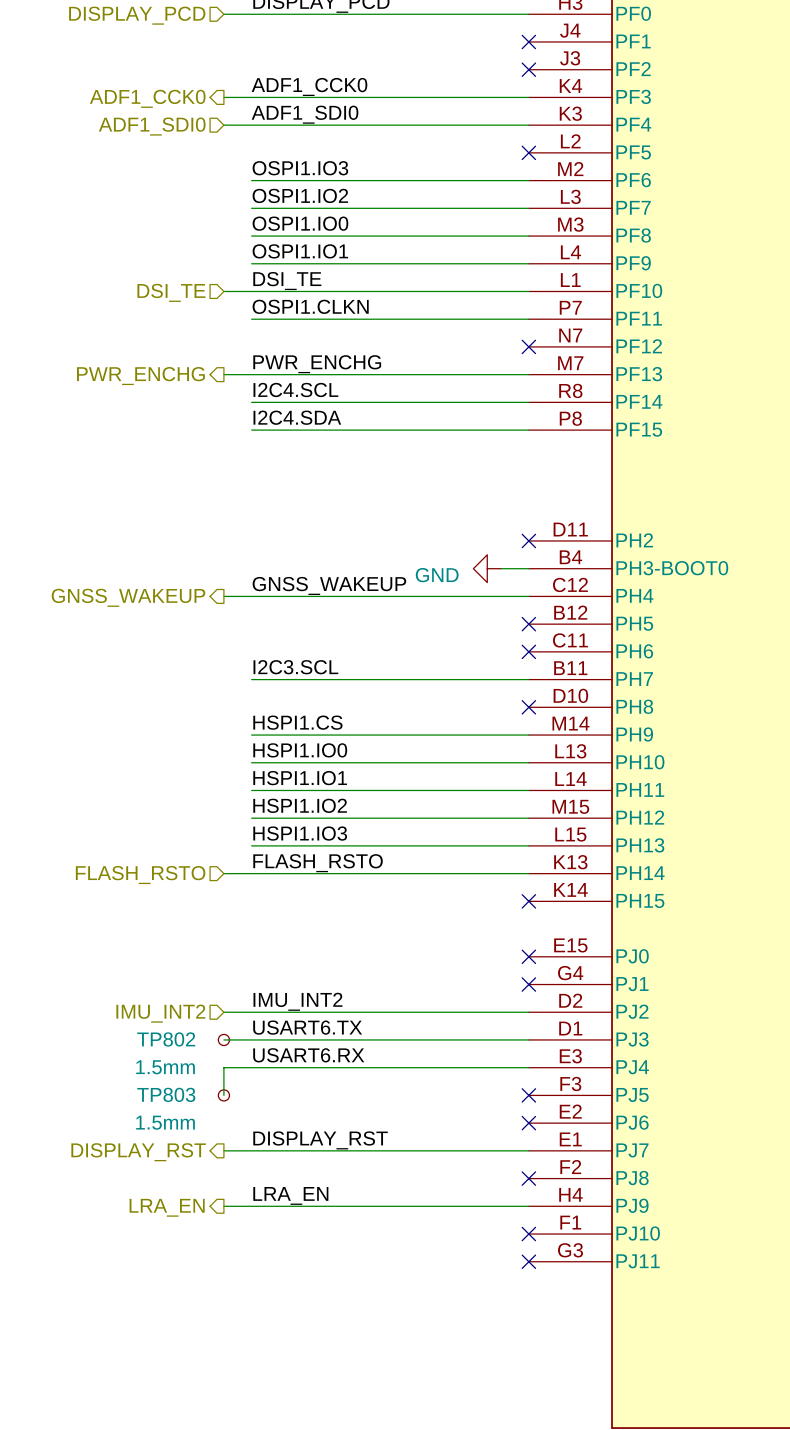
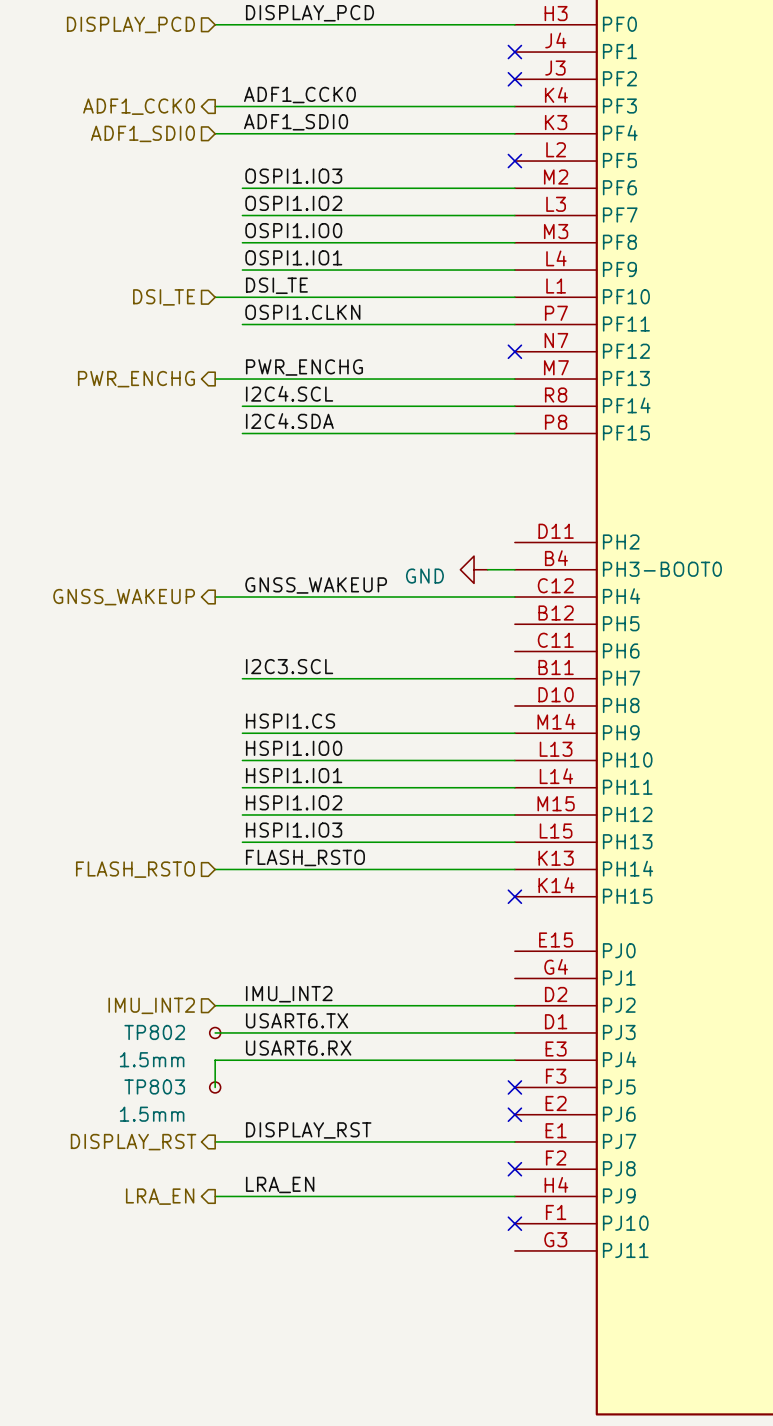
no-connect mark: (528, 540) -> none
no-connect mark: (528, 624) -> none
no-connect mark: (528, 651) -> none
no-connect mark: (528, 707) -> none
no-connect mark: (528, 956) -> none
no-connect mark: (528, 984) -> none
no-connect mark: (528, 1261) -> none

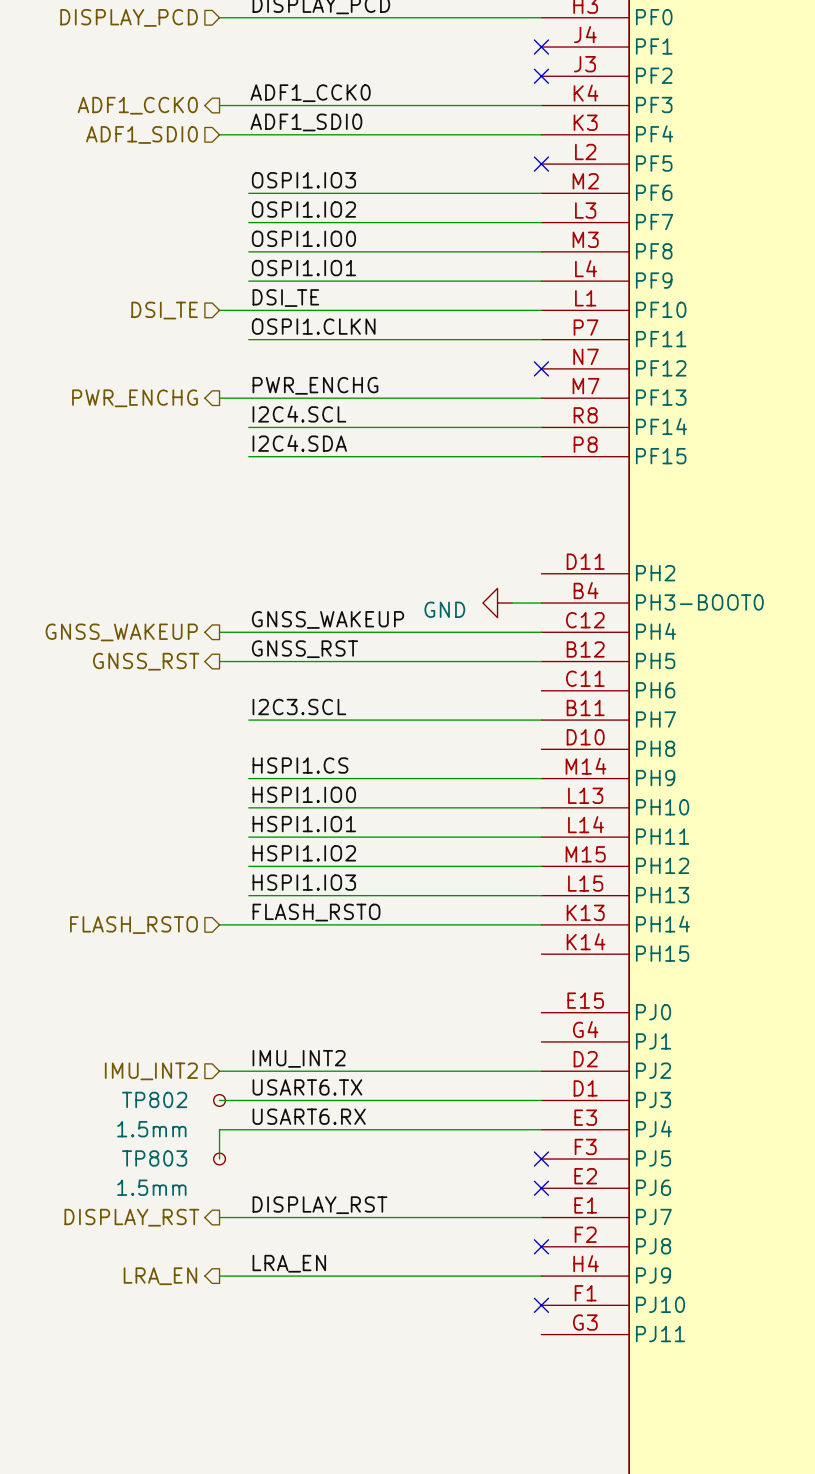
label: none -> GNSS_RST (304, 649)
hierarchical label: none -> GNSS_RST (146, 661)
wire: none -> (219, 661) (541, 661)
no-connect mark: (514, 896) -> none

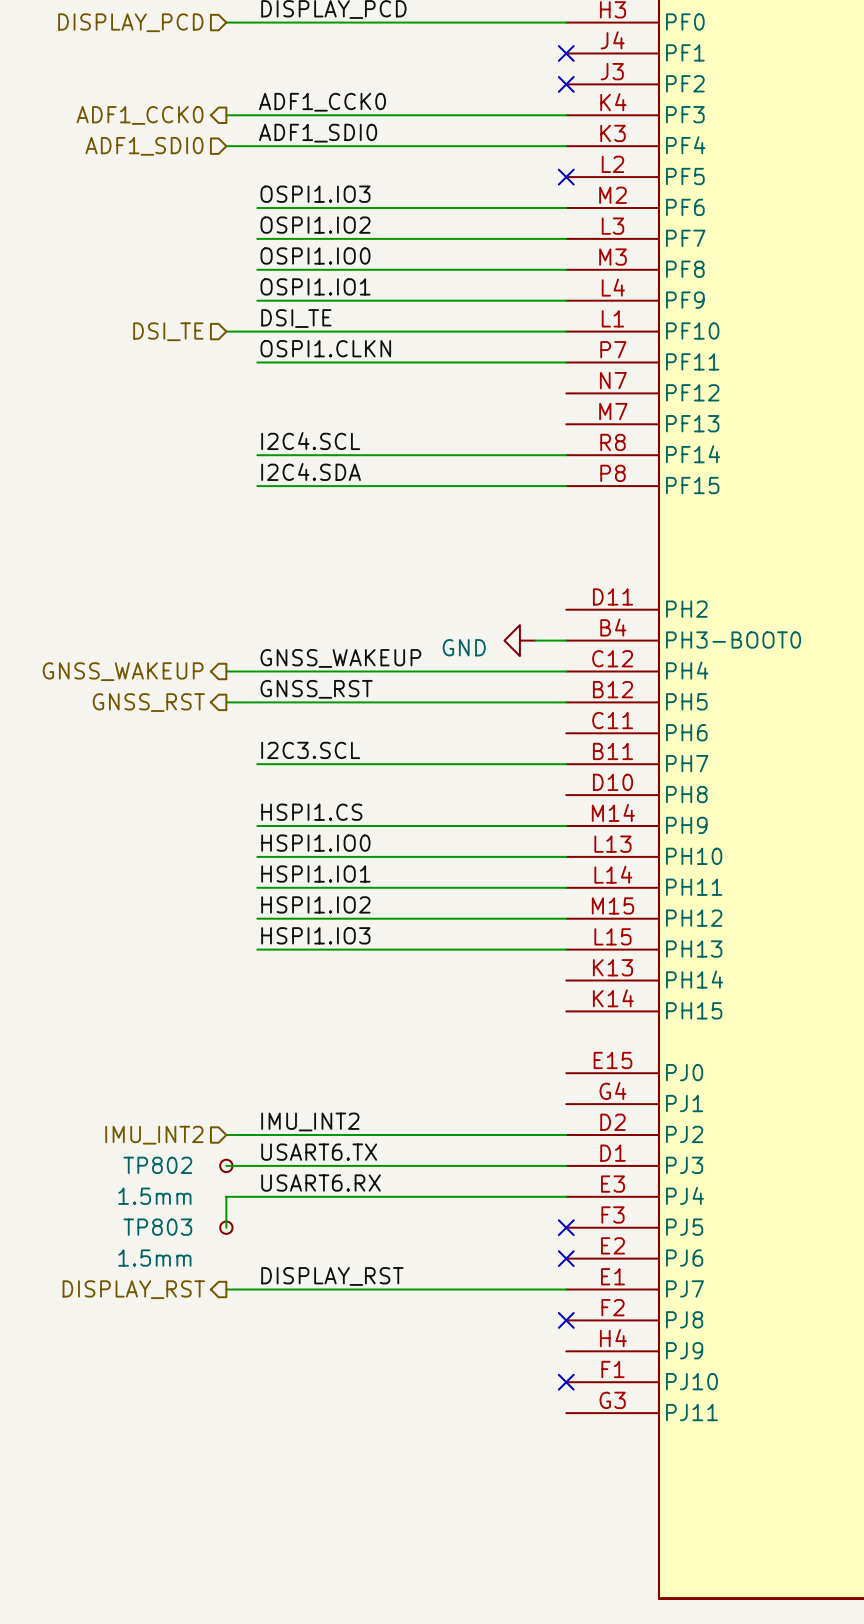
no-connect mark: (541, 368) -> none
label: PWR_ENCHG (315, 385) -> none
hierarchical label: PWR_ENCHG (135, 398) -> none
wire: (219, 398) (541, 398) -> none
label: FLASH_RSTO (316, 912) -> none
wire: (219, 924) (541, 924) -> none
hierarchical label: FLASH_RSTO (133, 925) -> none
label: LRA_EN (289, 1263) -> none
hierarchical label: LRA_EN (160, 1276) -> none
wire: (219, 1276) (541, 1276) -> none

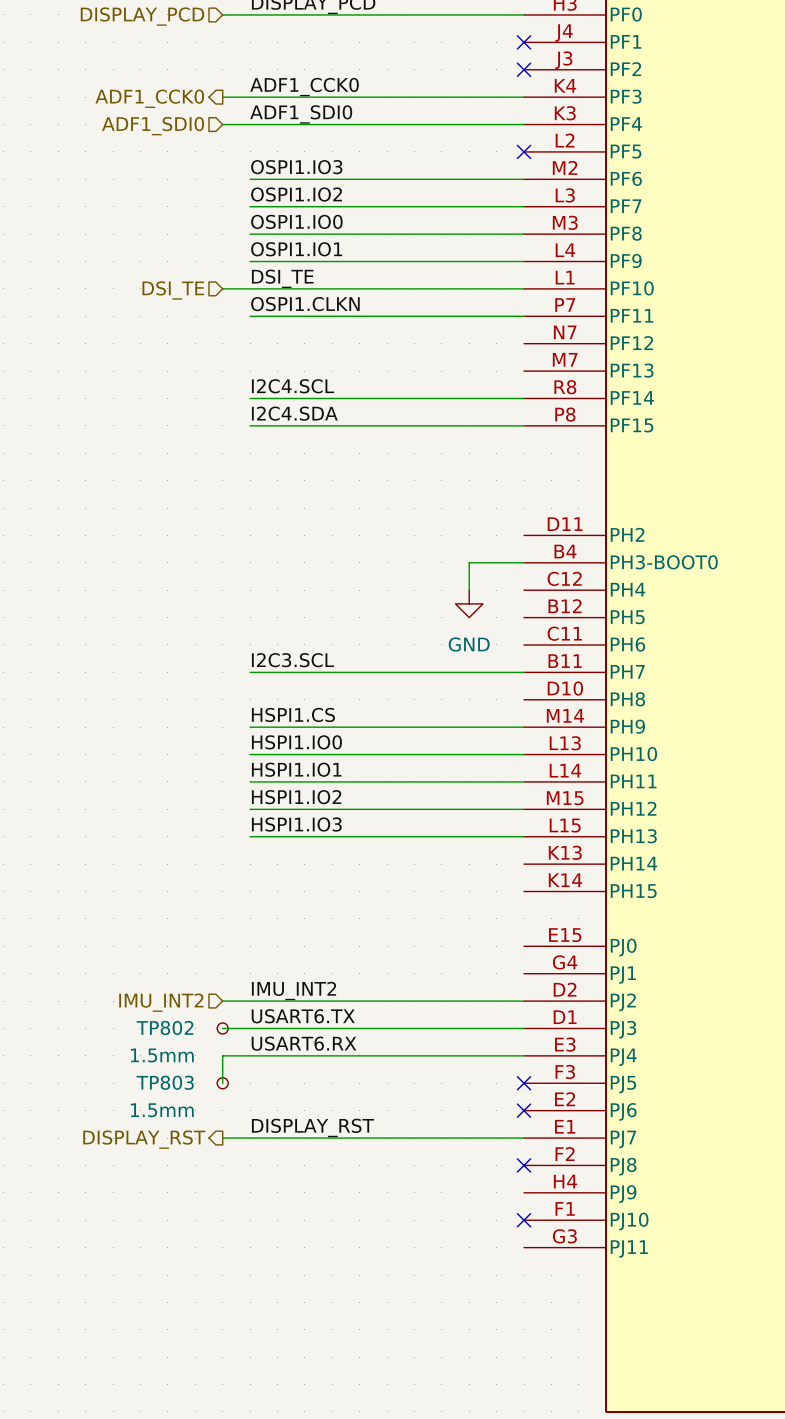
power symbol rotation: 0° (519, 640) -> 90° counterclockwise (469, 603)
power symbol position: GND (519, 640) -> GND (469, 603)
wire: none -> (496, 562) (469, 562) (469, 590)
label: GNSS_WAKEUP (340, 658) -> none
hierarchical label: GNSS_WAKEUP (123, 671) -> none
wire: (226, 671) (566, 671) -> none
label: GNSS_RST (316, 689) -> none
hierarchical label: GNSS_RST (148, 702) -> none
wire: (226, 702) (566, 702) -> none

